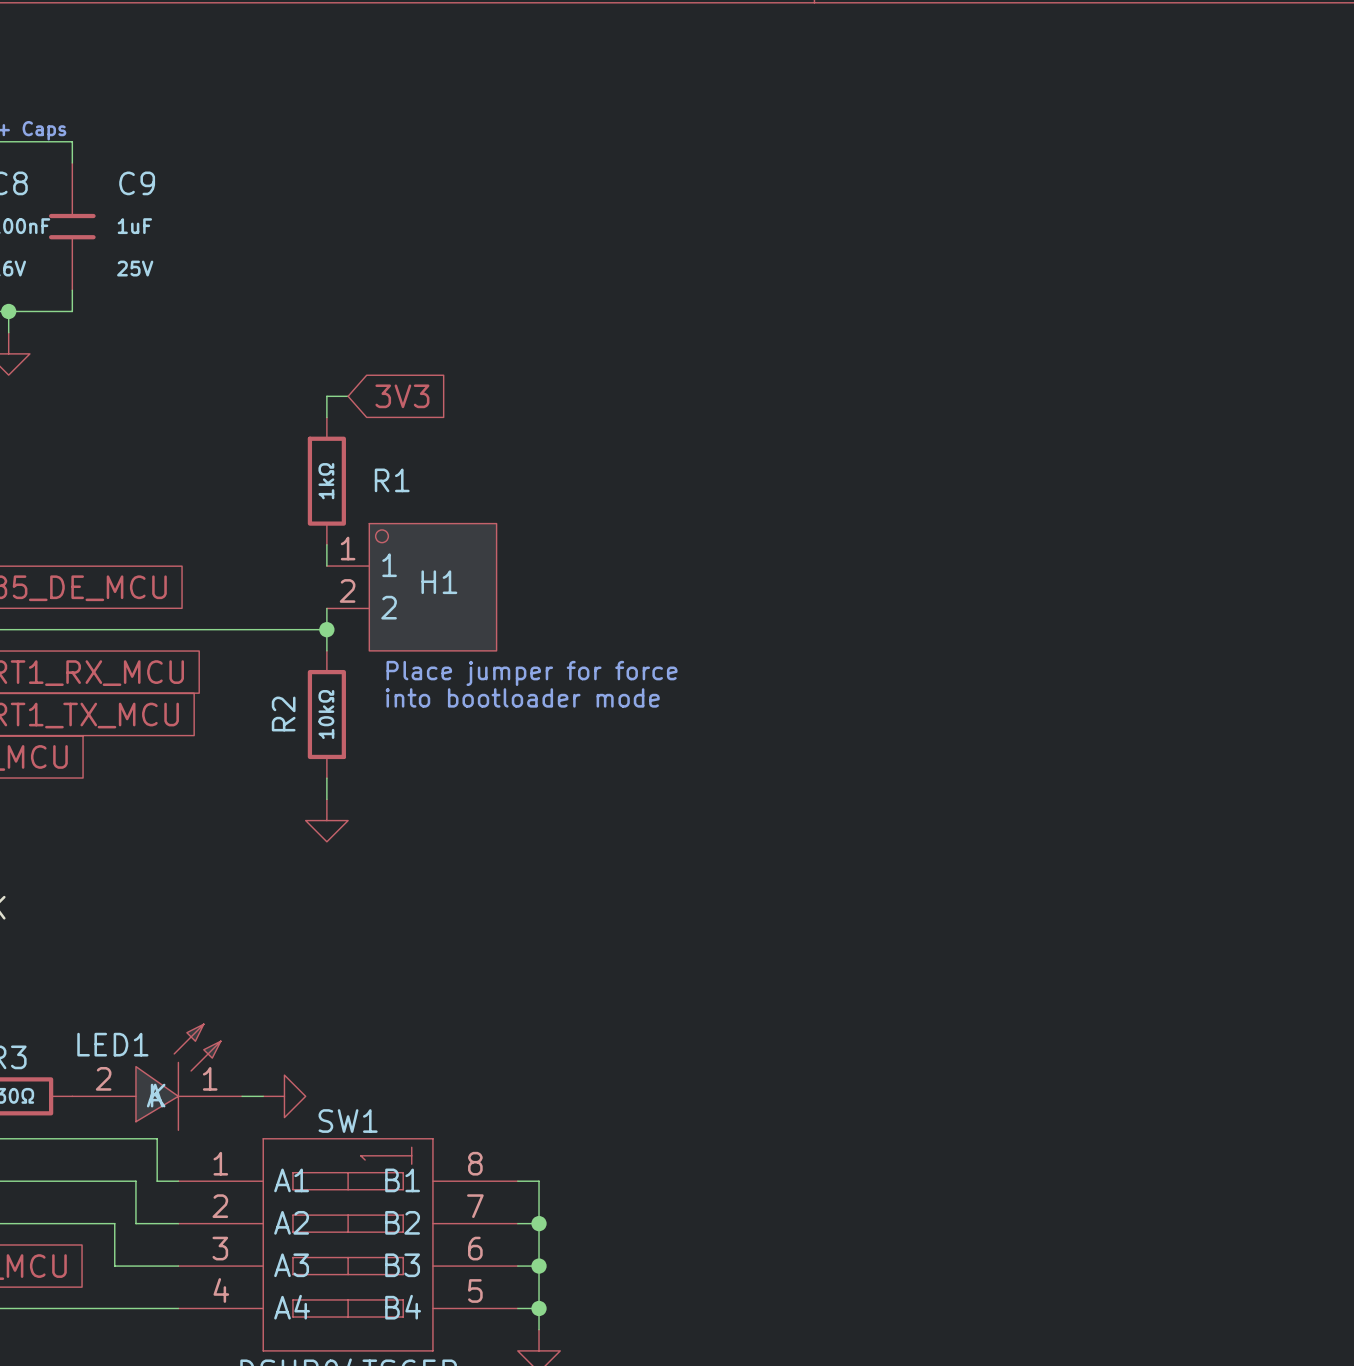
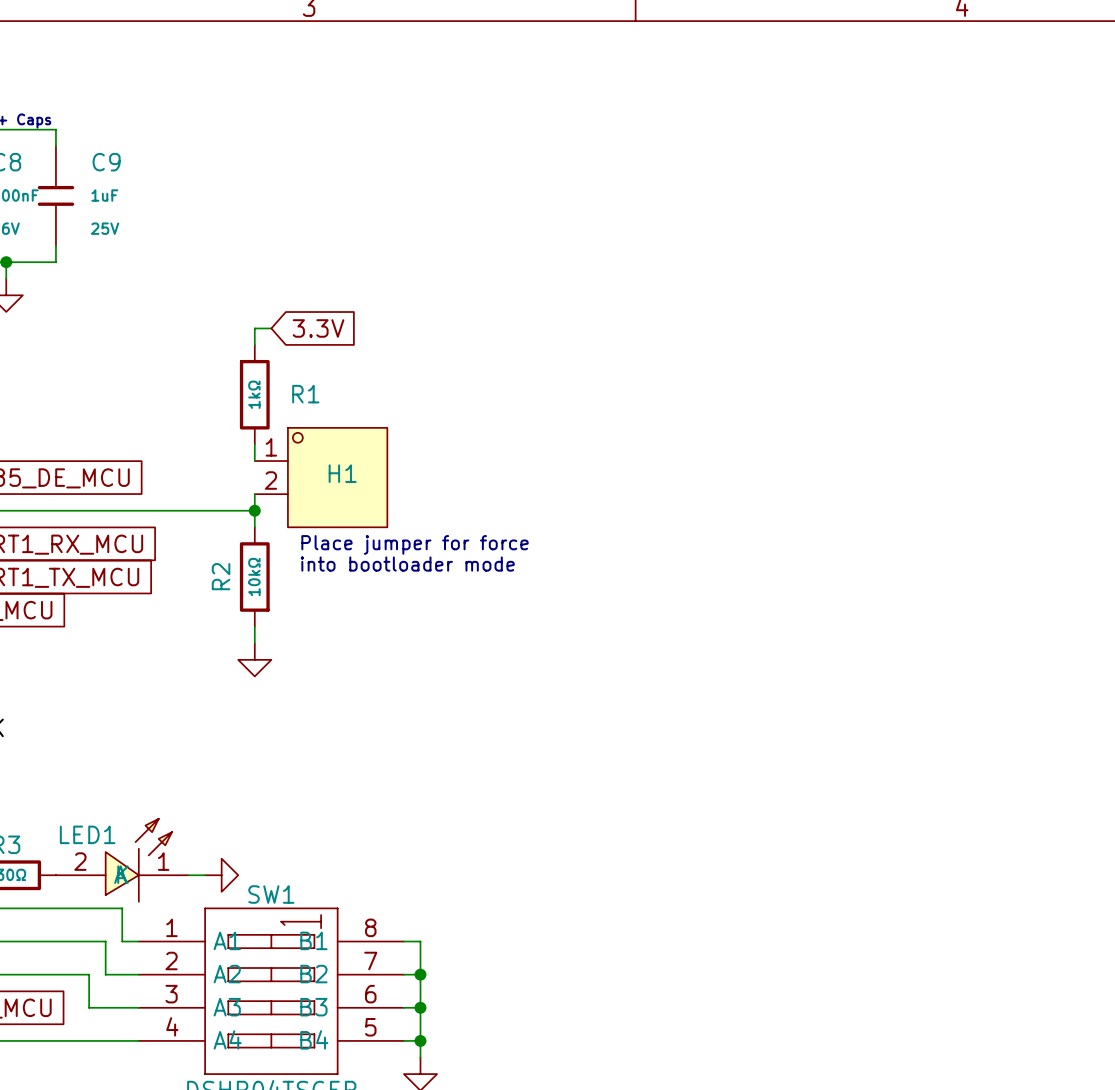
global label: 3V3 (402, 396) -> 3.3V (318, 328)
H1 pin name: 1 (389, 565) -> none
H1 pin name: 2 (389, 607) -> none

